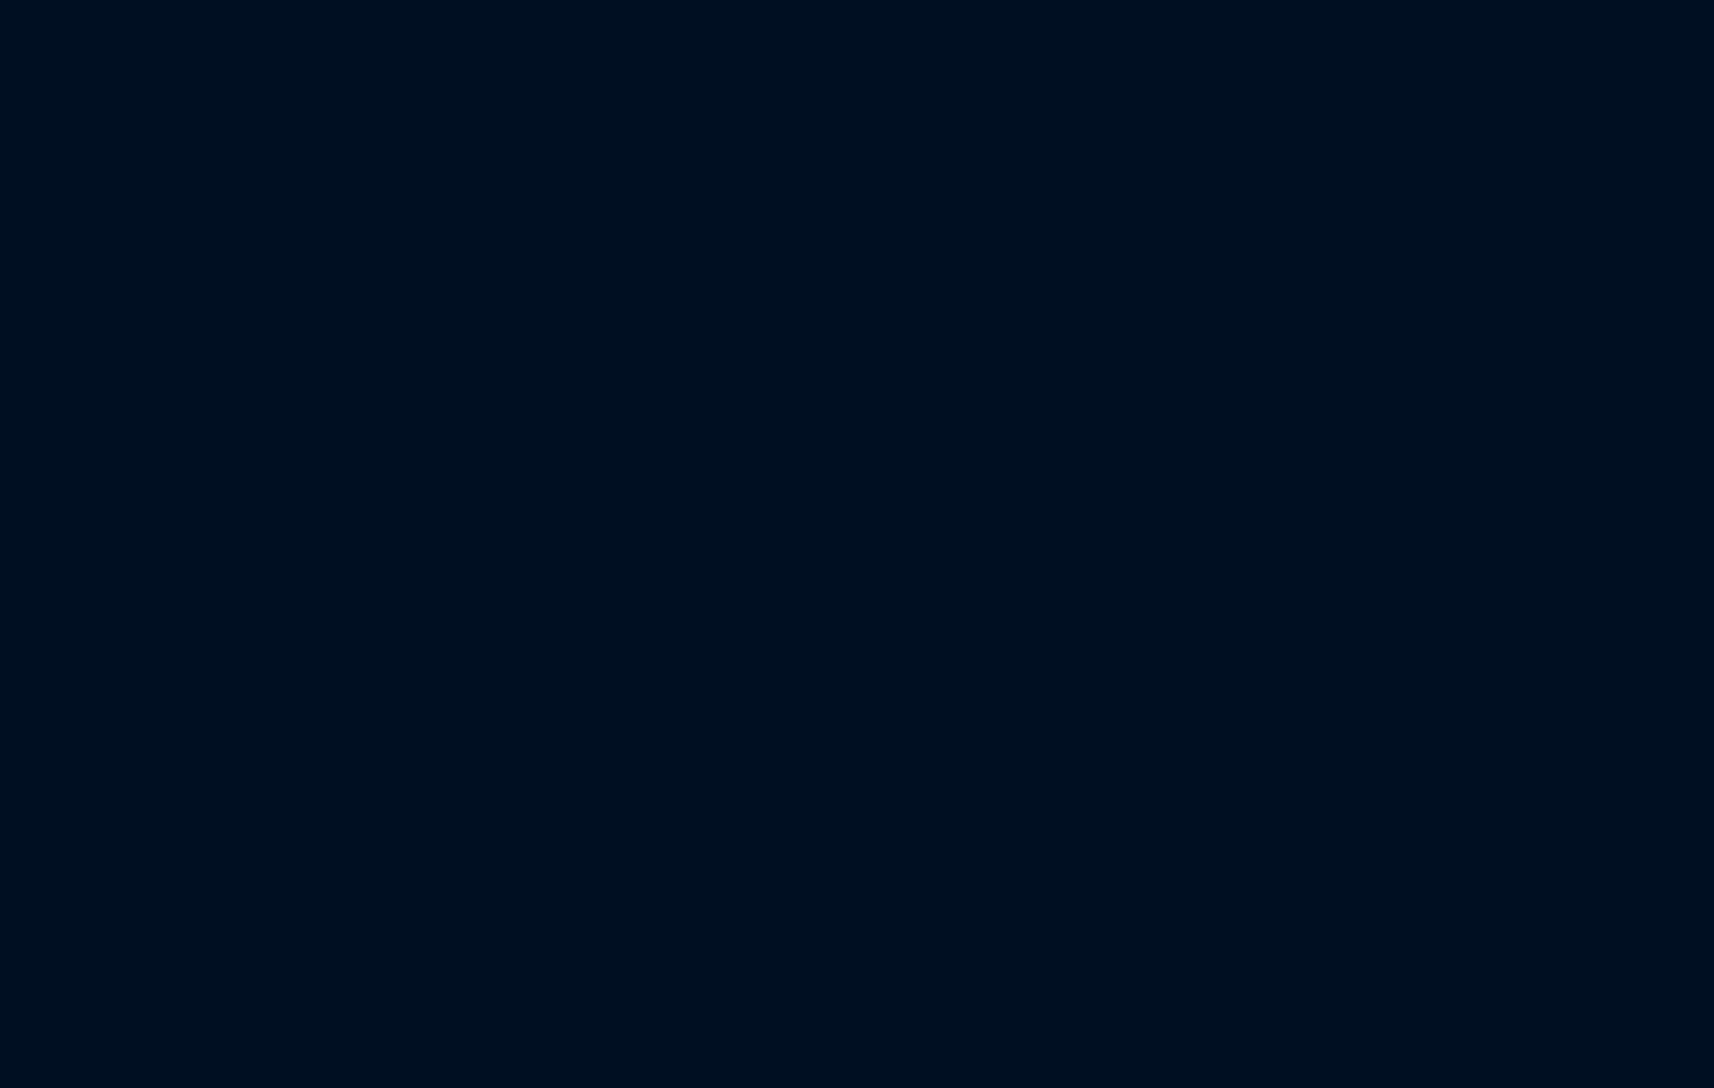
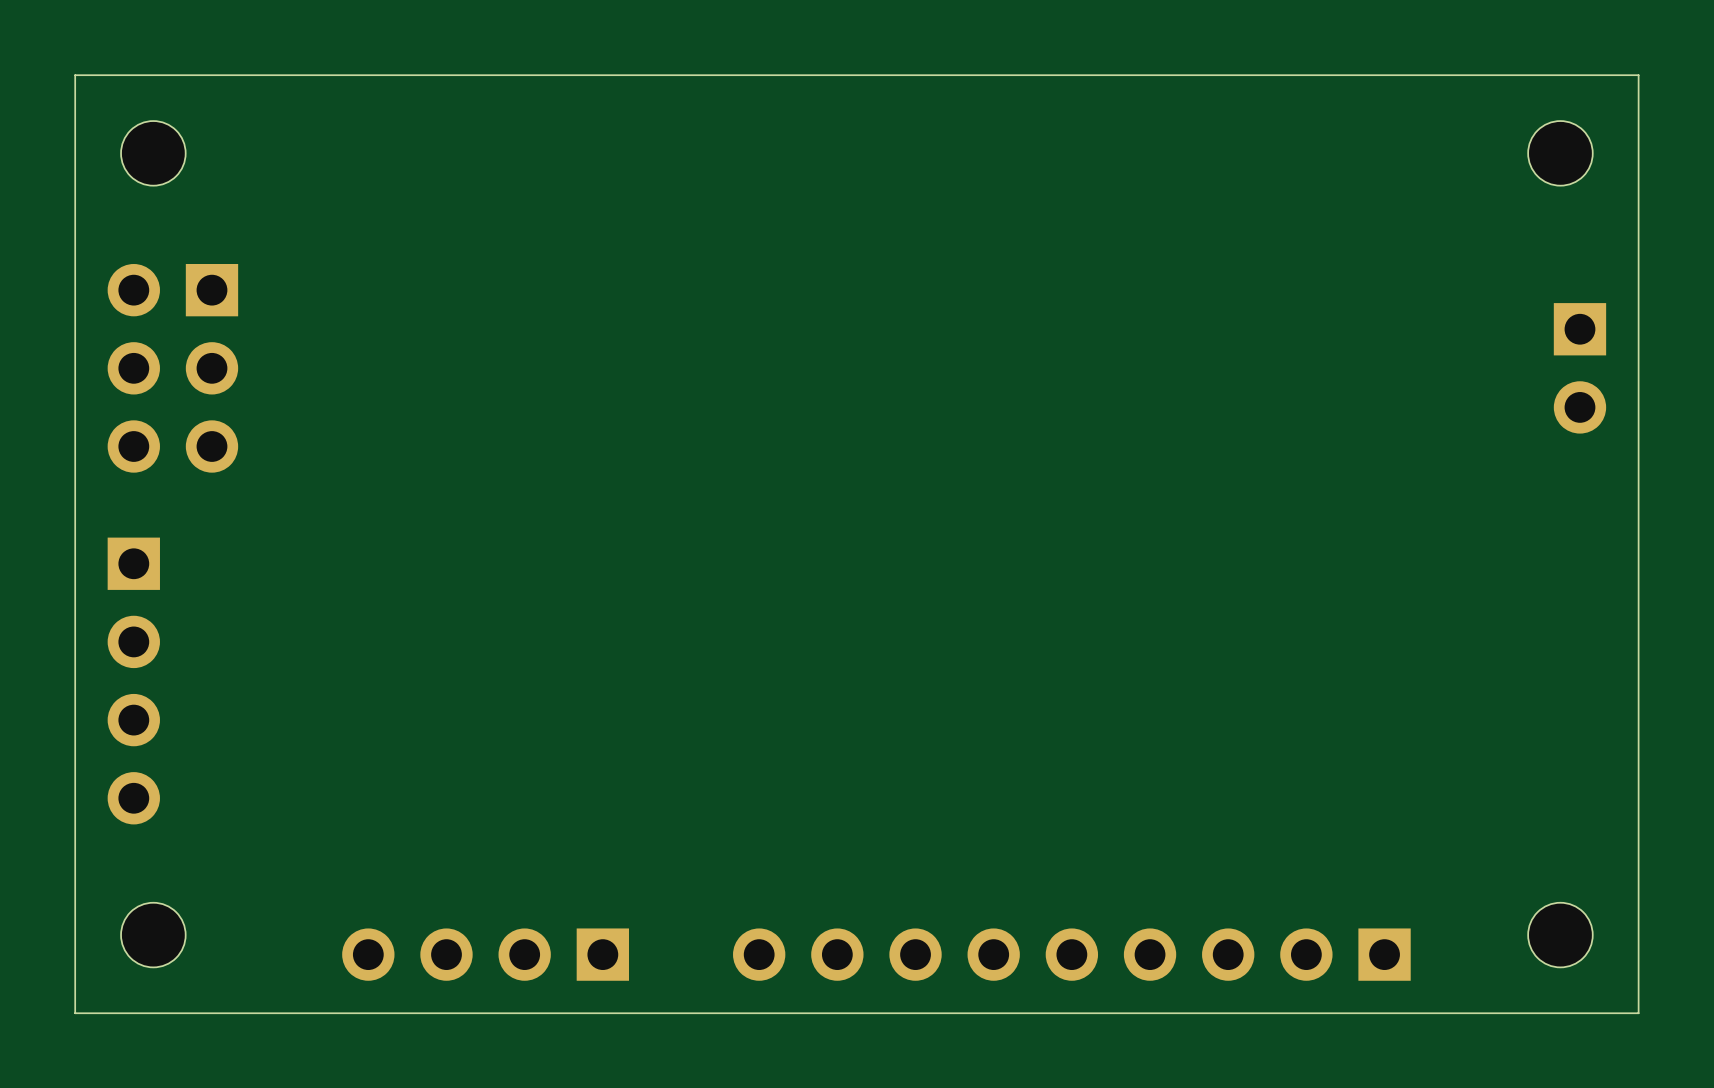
board edge: none -> (1638, 75) (75, 75) (75, 1013) (1638, 1013) (1638, 75)
part: none -> (153, 153)
part: none -> (1560, 153)
part: none -> (172, 368)
part: none -> (1579, 368)
part: none -> (133, 681)
part: none -> (153, 935)
part: none -> (1560, 935)
part: none -> (485, 954)
part: none -> (1071, 954)

